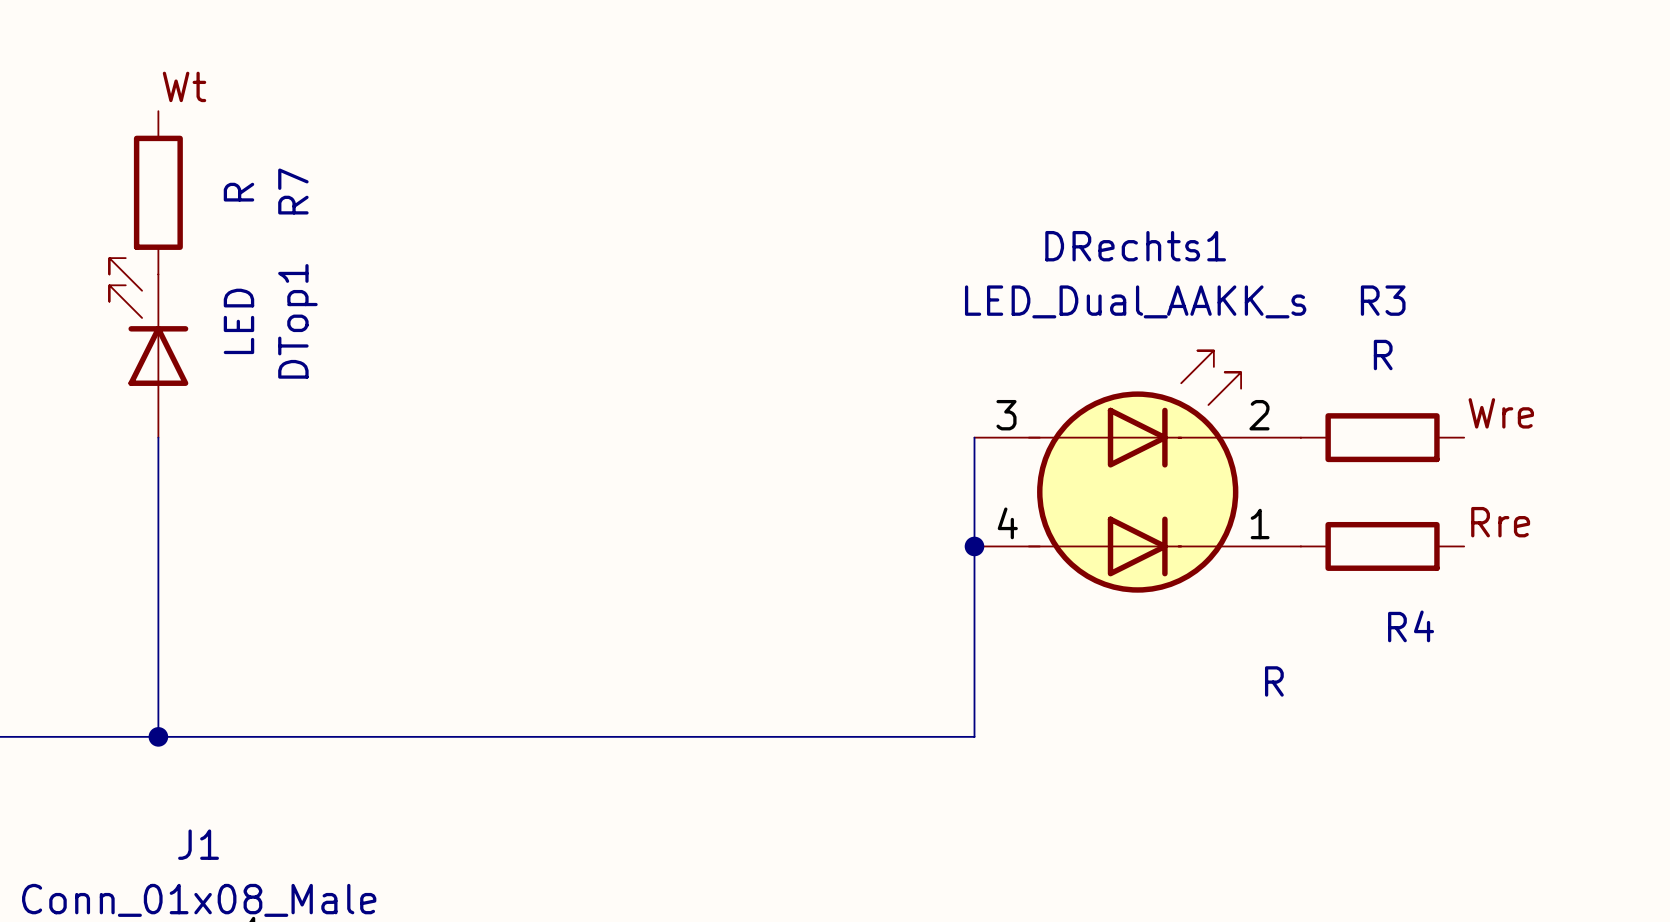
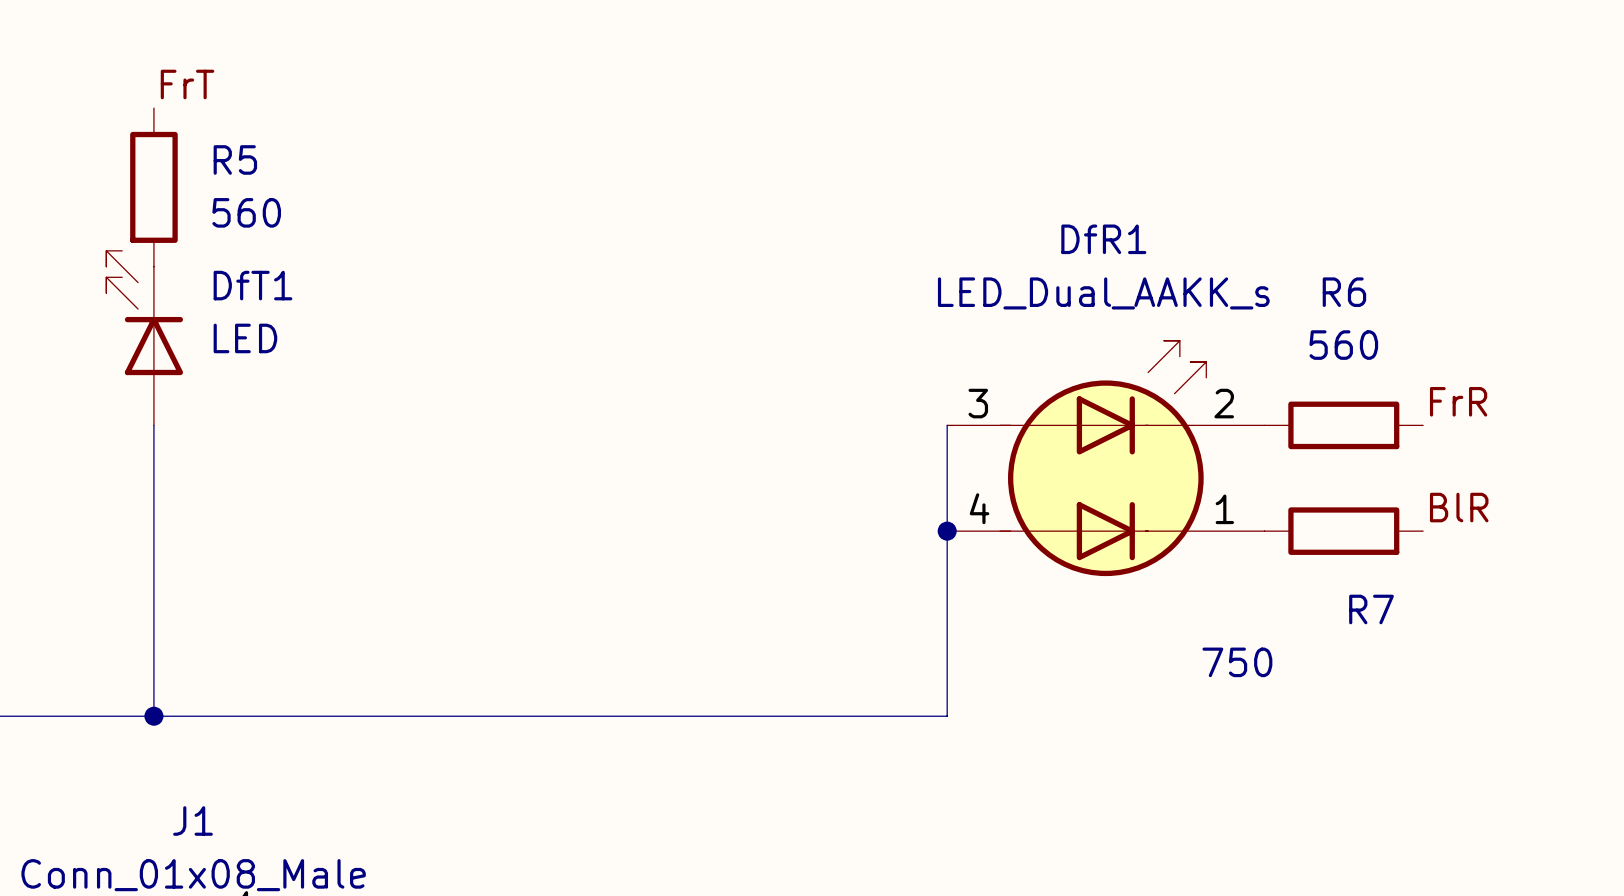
label: Wt (184, 86) -> FrT (187, 84)
R7 name: R7 (293, 191) -> R5 (235, 159)
R7 value: R (238, 192) -> 560 (246, 212)
DRechts1 name: DRechts1 (1135, 246) -> DfR1 (1103, 239)
R3 name: R3 (1383, 300) -> R6 (1344, 292)
DTop1 value rotation: 0° (238, 321) -> 90° clockwise (245, 338)
DTop1 name: DTop1 (297, 321) -> DfT1 (252, 285)
R3 value: R (1383, 355) -> 560 (1343, 345)
label: Wre (1501, 413) -> FrR (1458, 401)
label: Rre (1500, 522) -> BlR (1459, 507)
R4 name: R4 (1411, 626) -> R7 (1371, 609)
R4 value: R (1274, 681) -> 750 (1237, 662)

